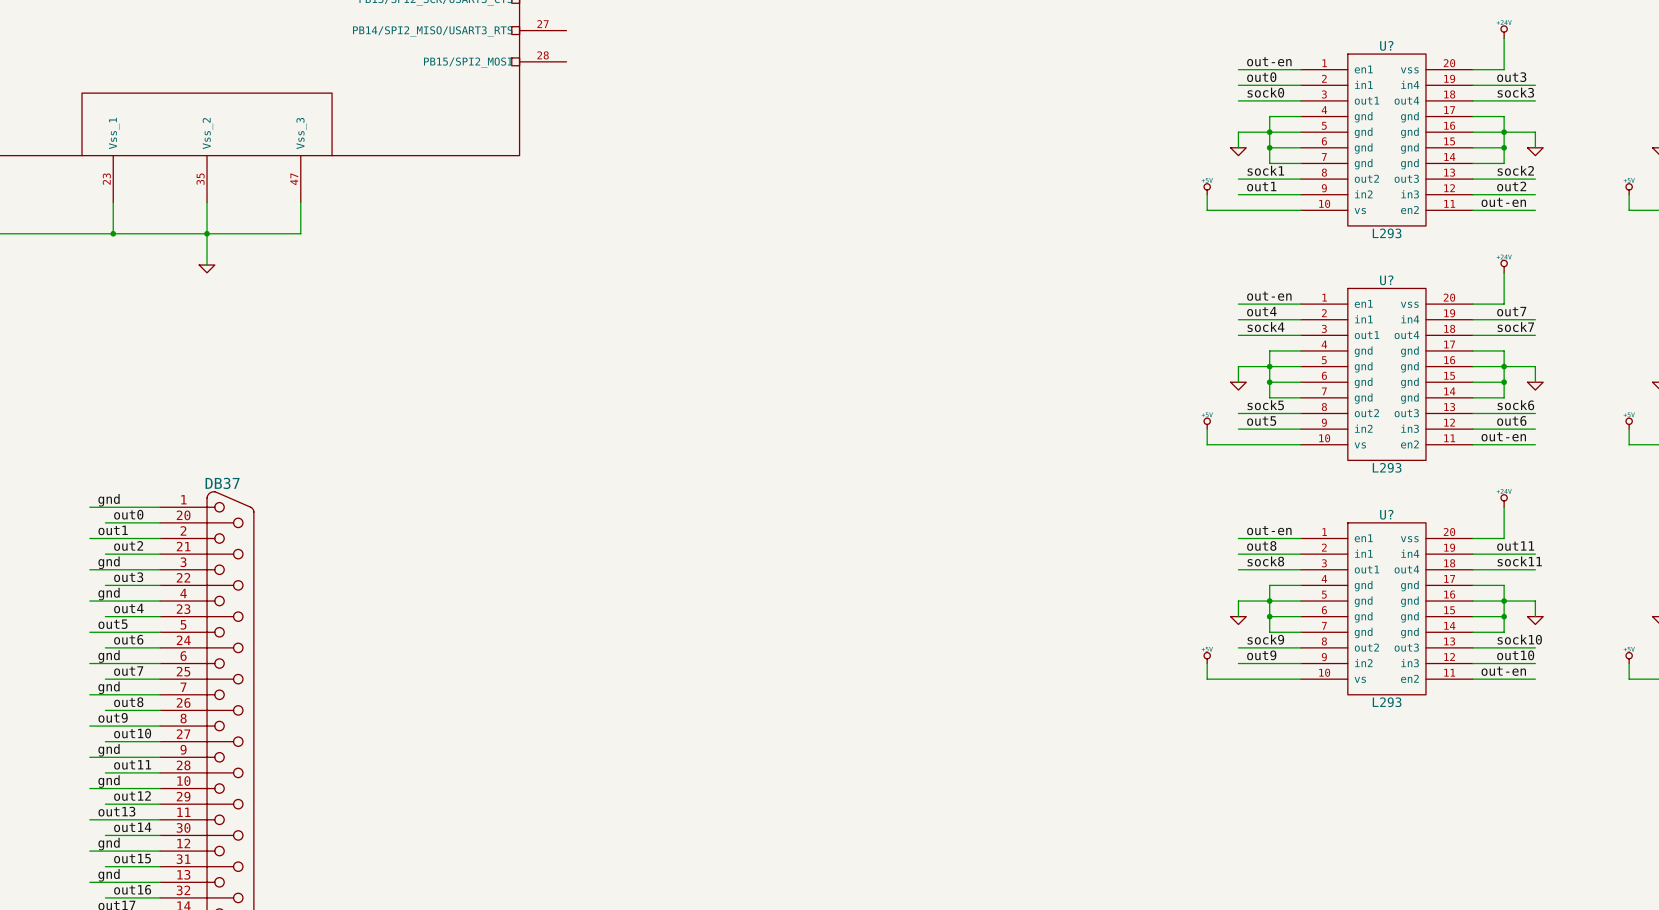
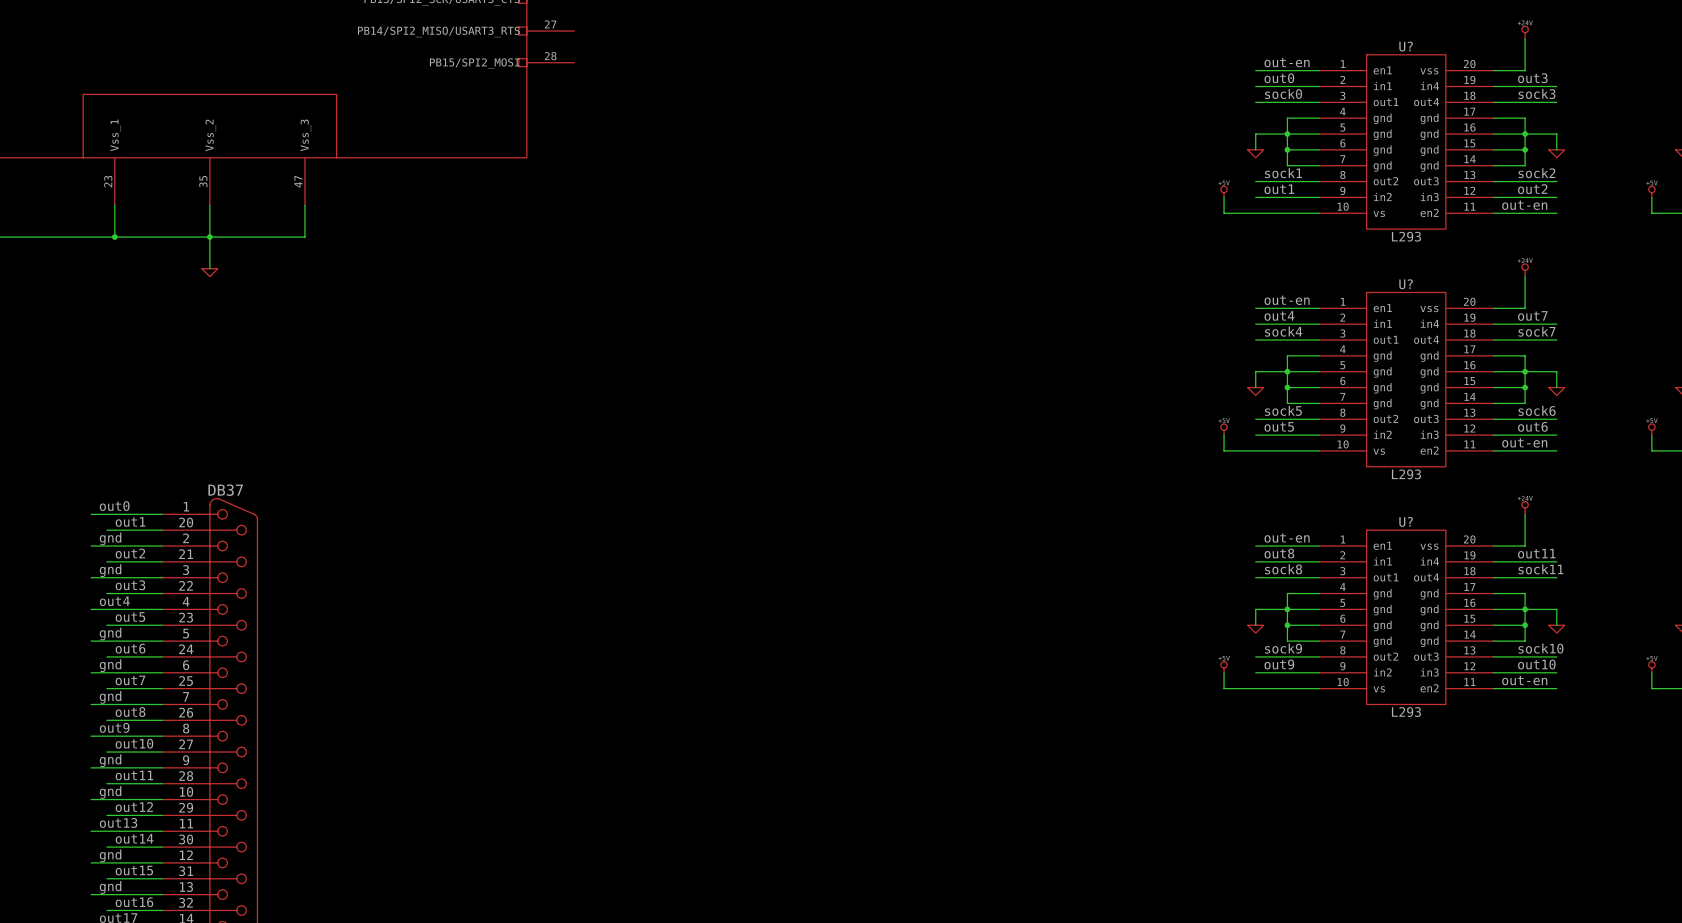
label: gnd (109, 500) -> out0 (114, 506)
label: out0 (128, 514) -> out1 (130, 521)
label: out1 (113, 530) -> gnd (110, 538)
label: gnd (109, 594) -> out4 (114, 601)
label: out4 (128, 608) -> out5 (130, 617)
label: out5 (113, 624) -> gnd (110, 634)

